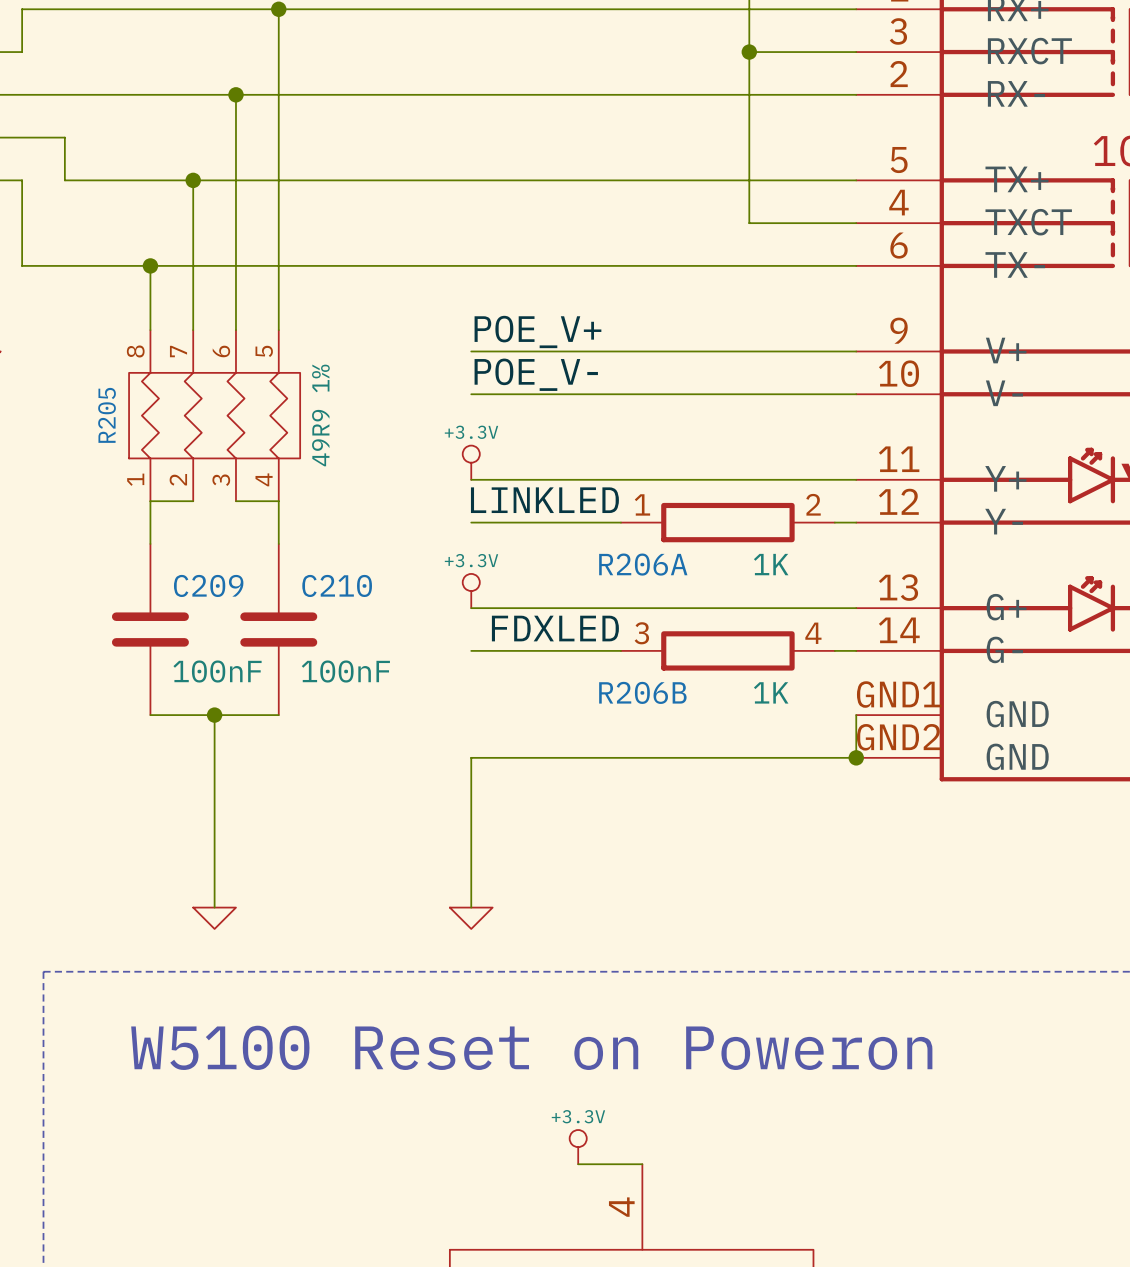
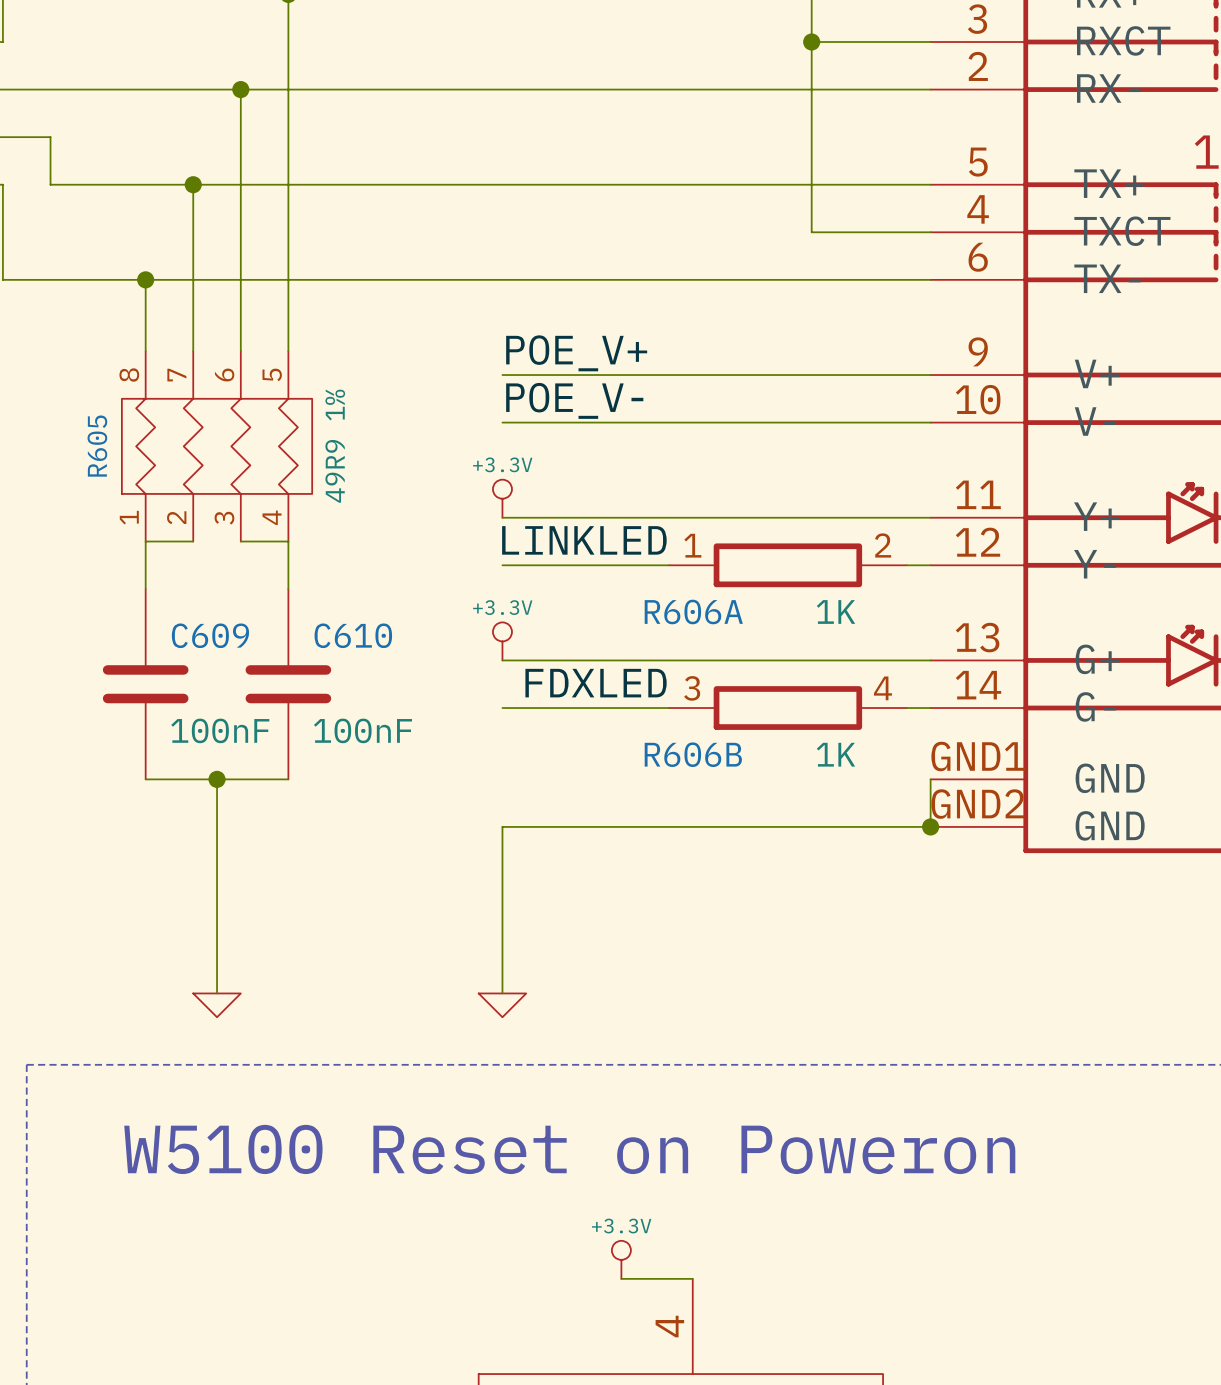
R205 name: R205 (107, 415) -> R605 (97, 446)
R206A name: R206A (643, 564) -> R606A (693, 611)
C209 name: C209 (208, 585) -> C609 (210, 635)
C210 name: C210 (337, 585) -> C610 (353, 635)
R206B name: R206B (642, 692) -> R606B (693, 754)

